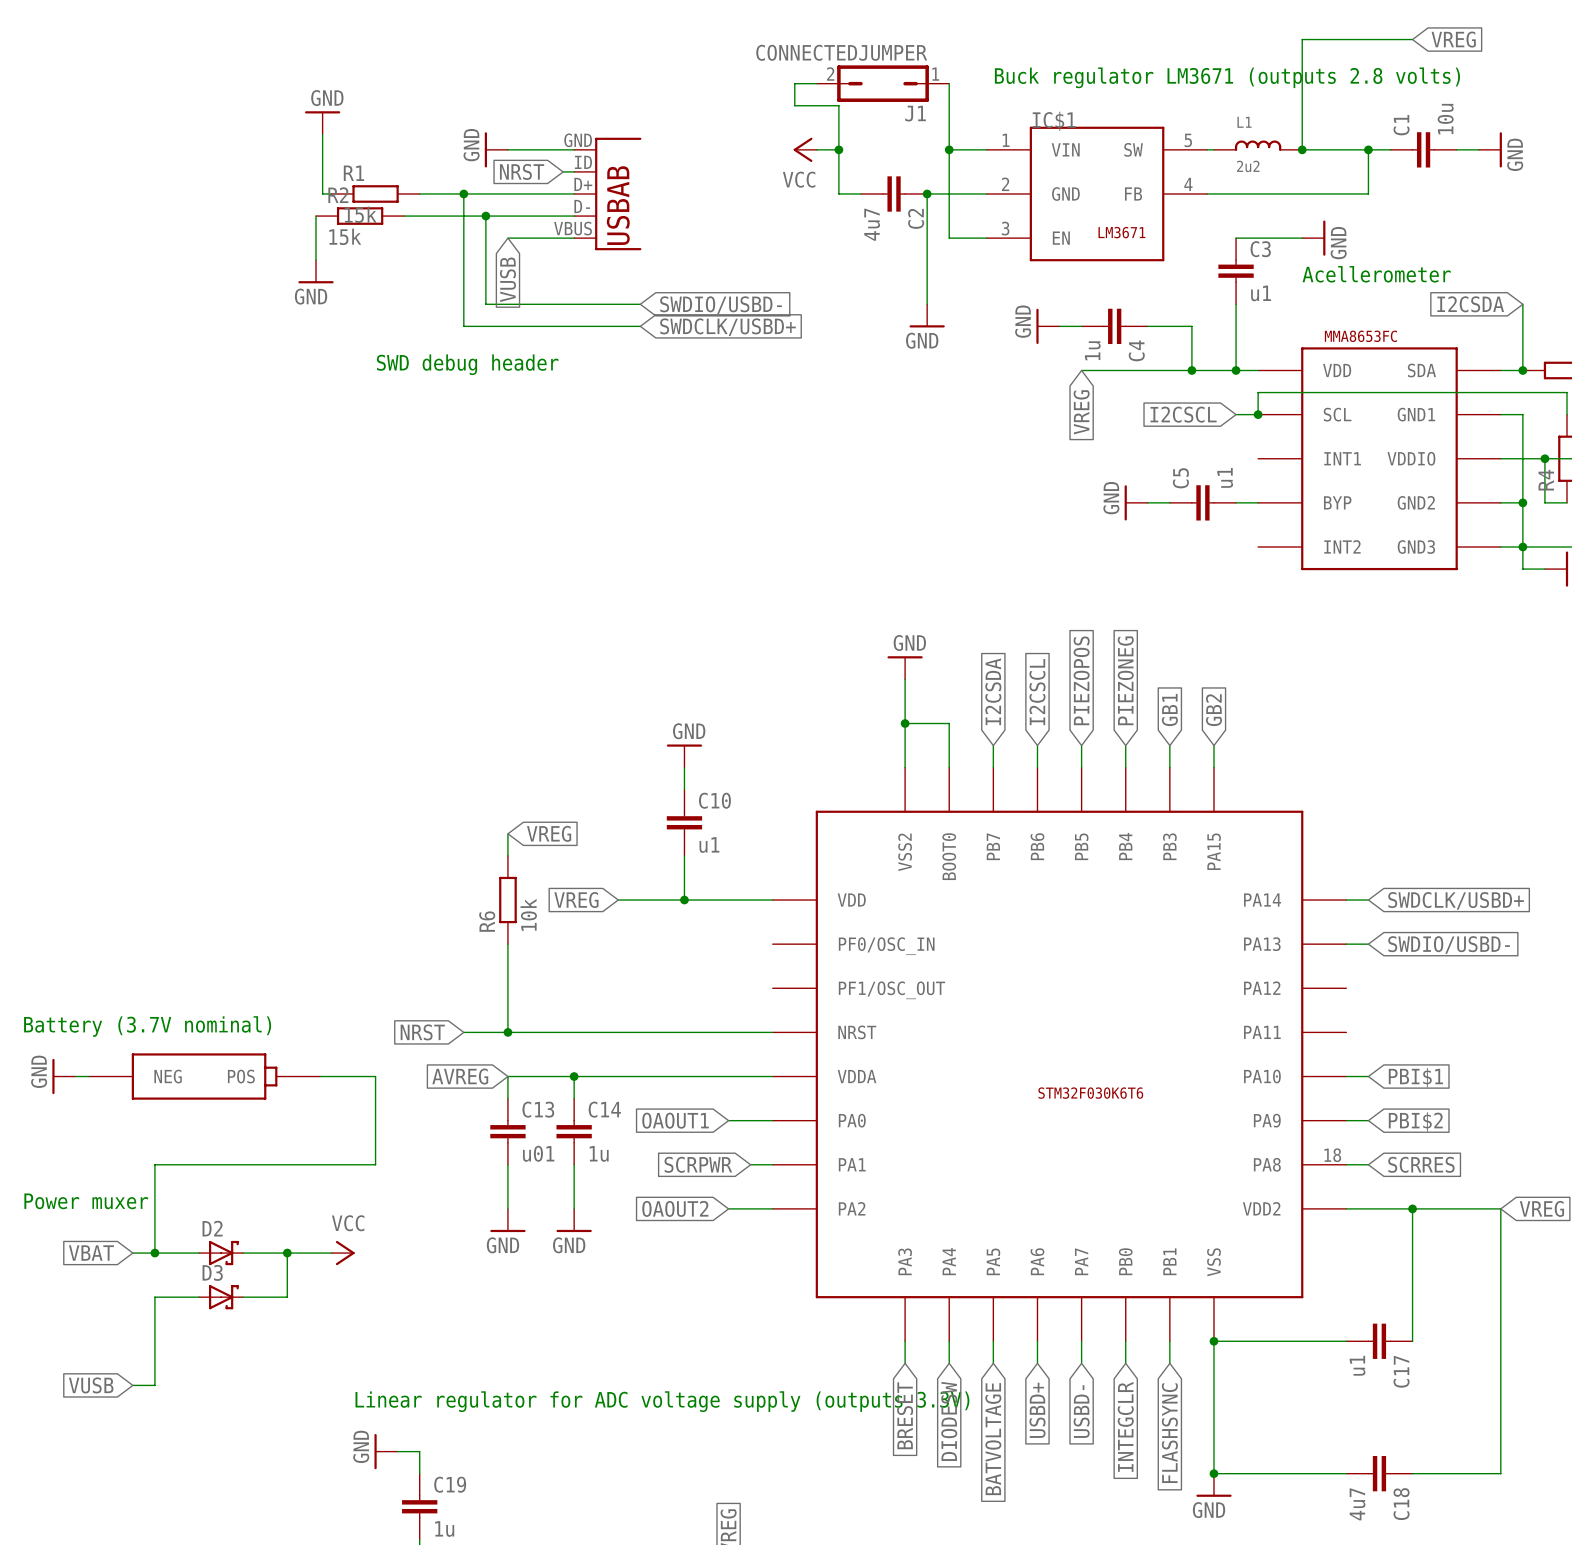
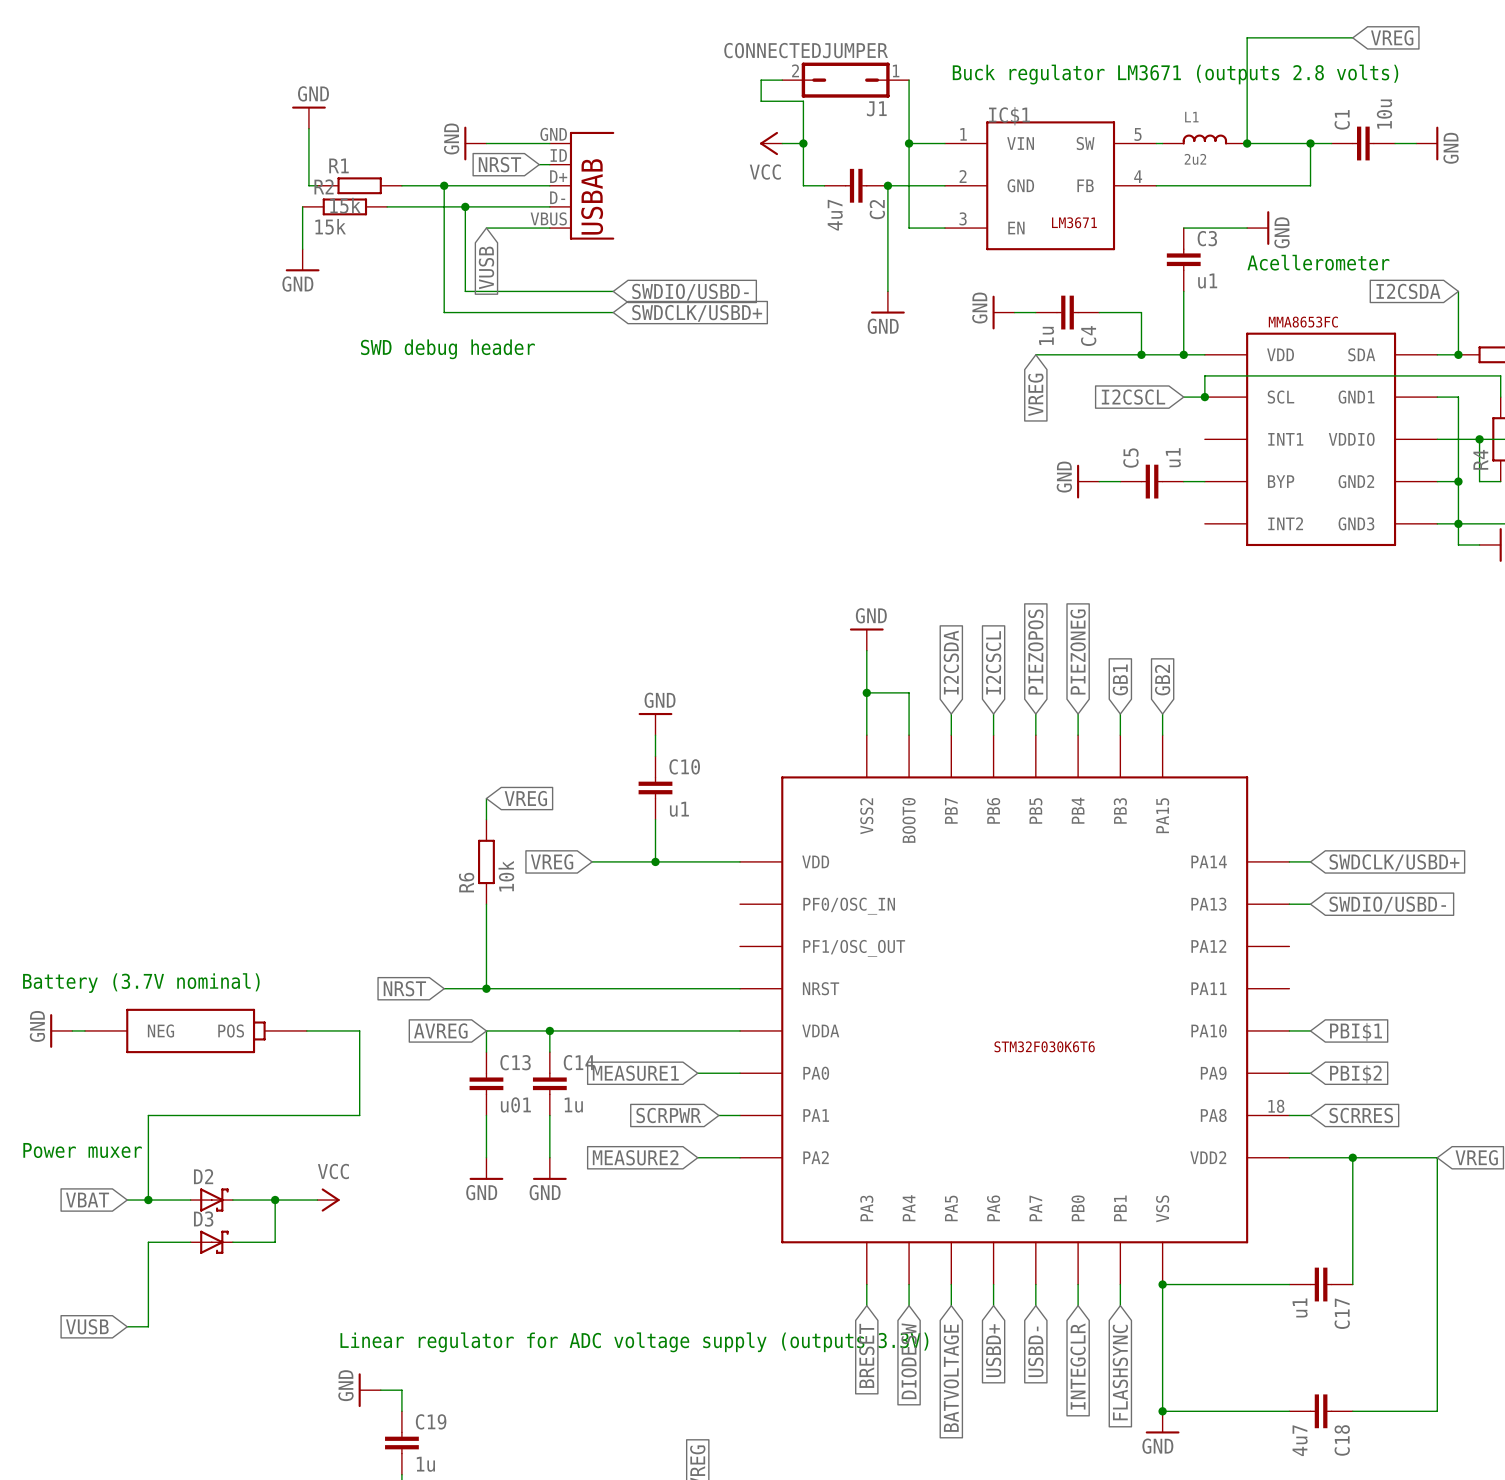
global label: OAOUT1 (675, 1120) -> MEASURE1 (635, 1073)
global label: OAOUT2 (675, 1208) -> MEASURE2 (635, 1157)

